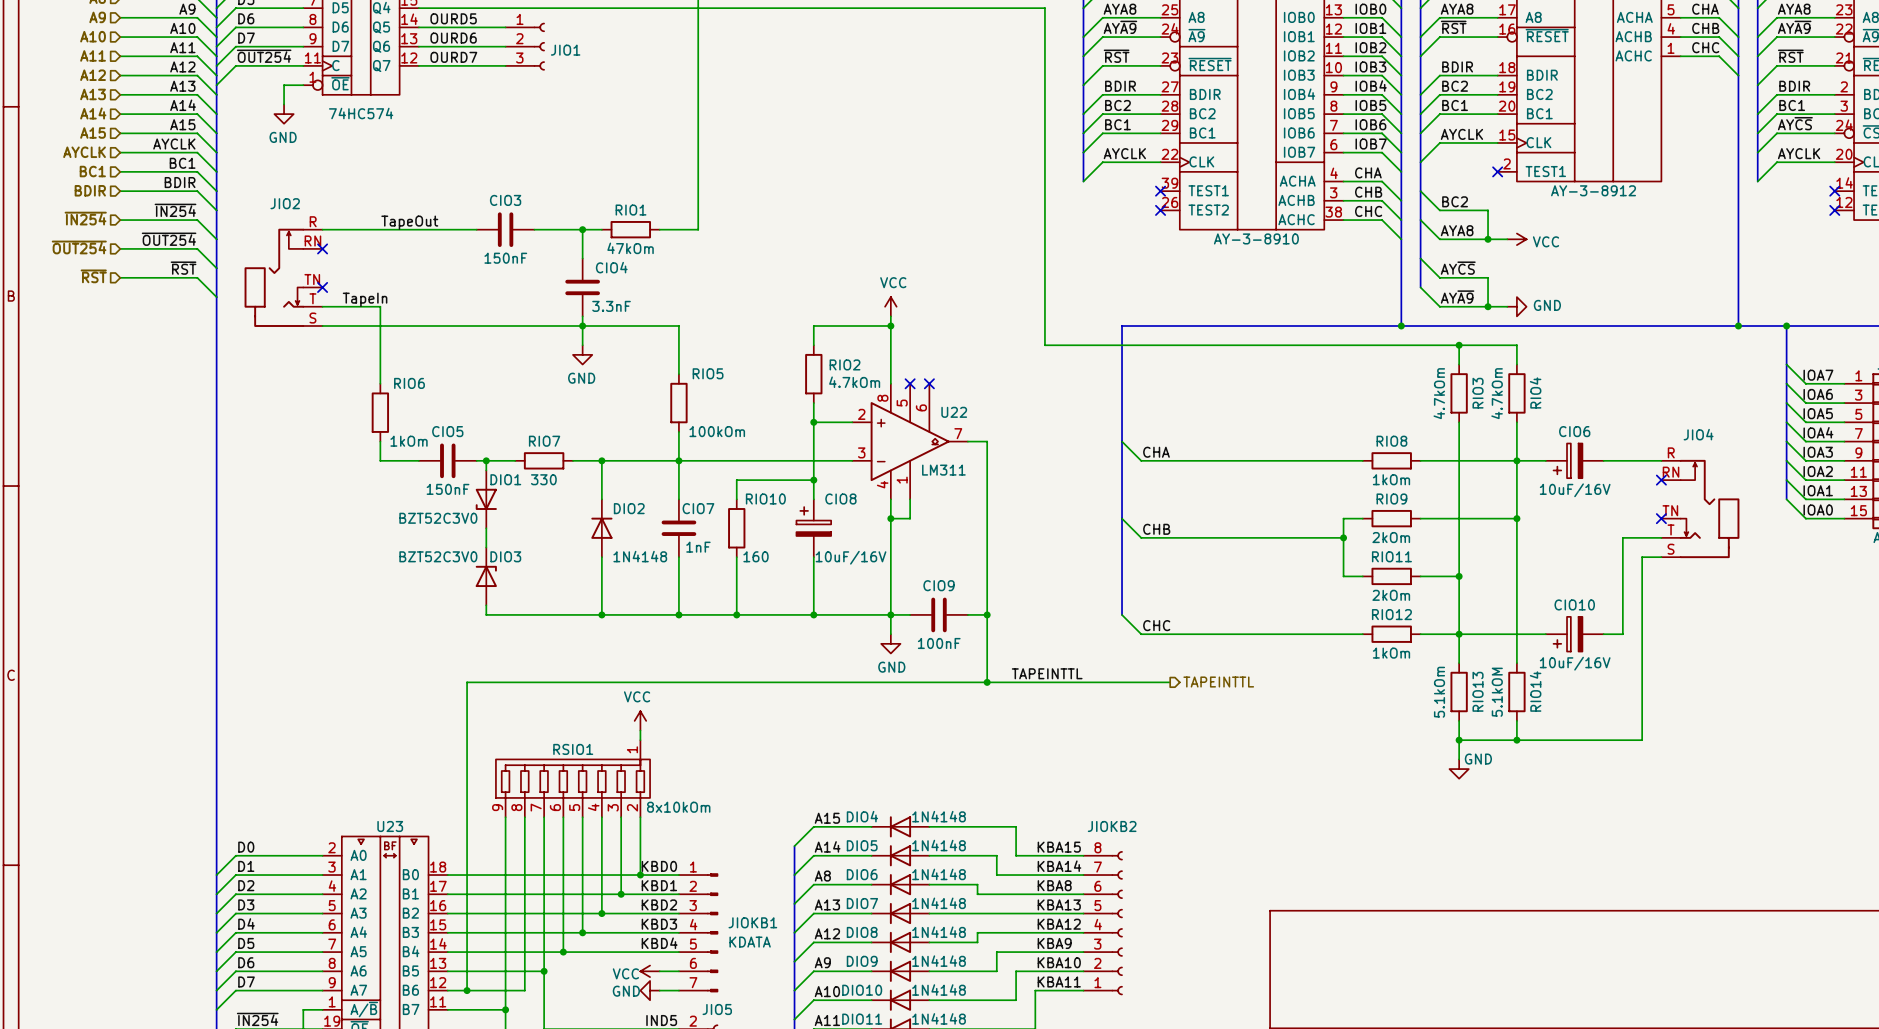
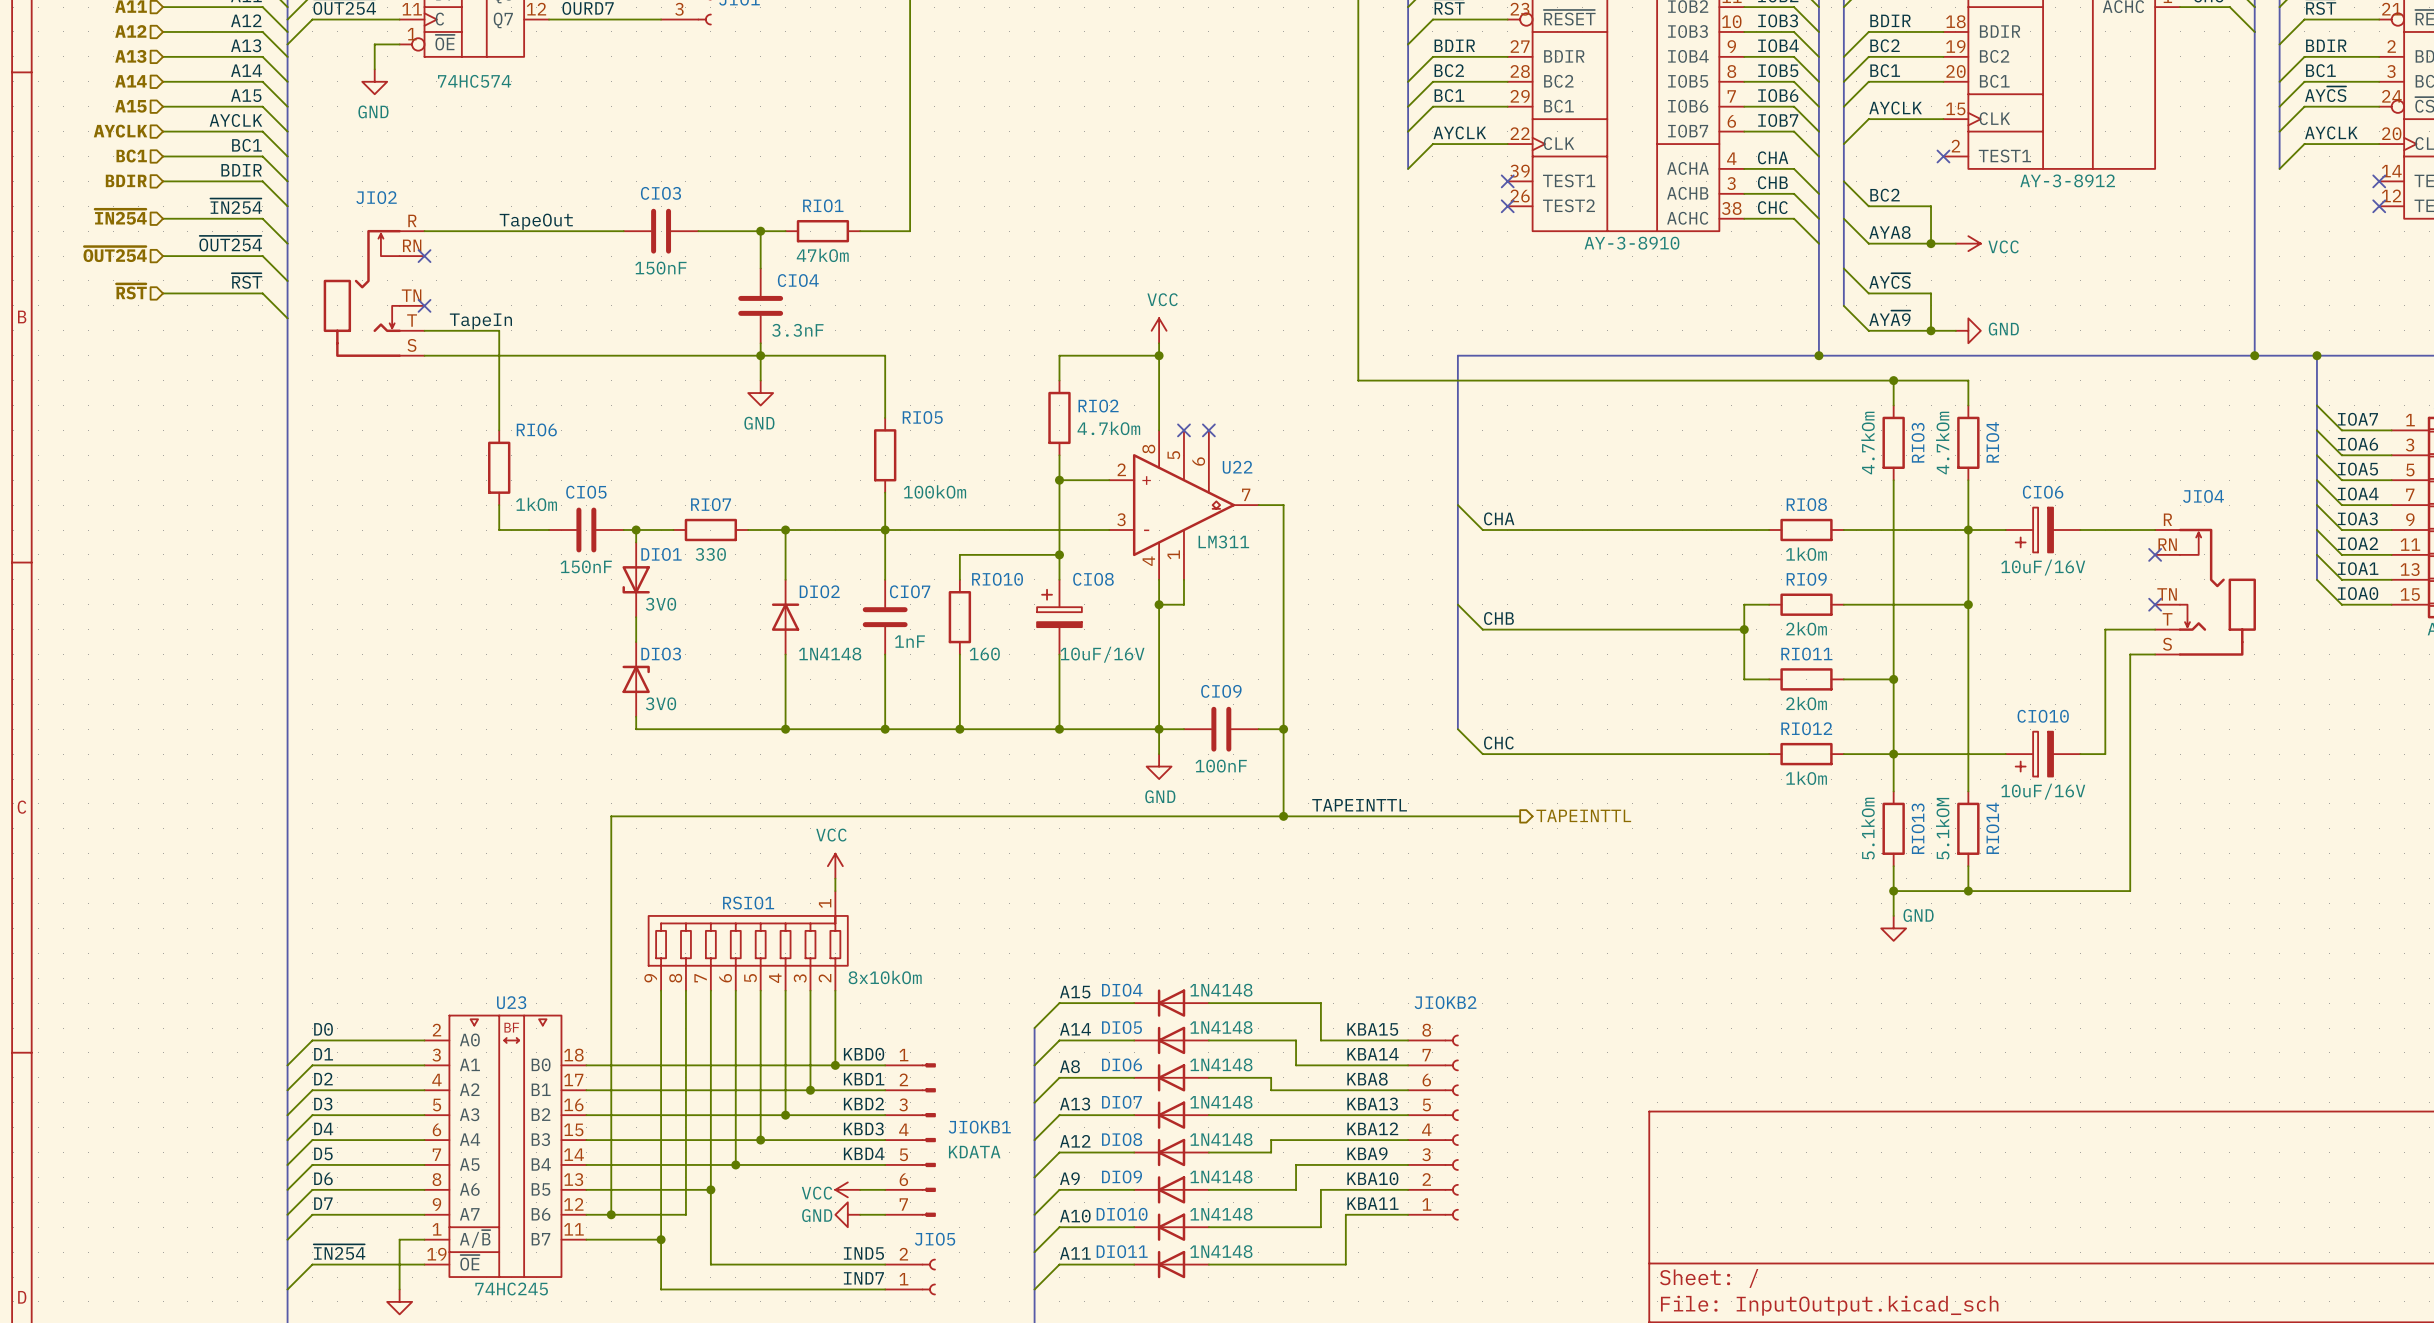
DIO1 value: BZT52C3V0 (438, 518) -> 3V0 (661, 604)
DIO3 value: BZT52C3V0 (438, 556) -> 3V0 (661, 703)

